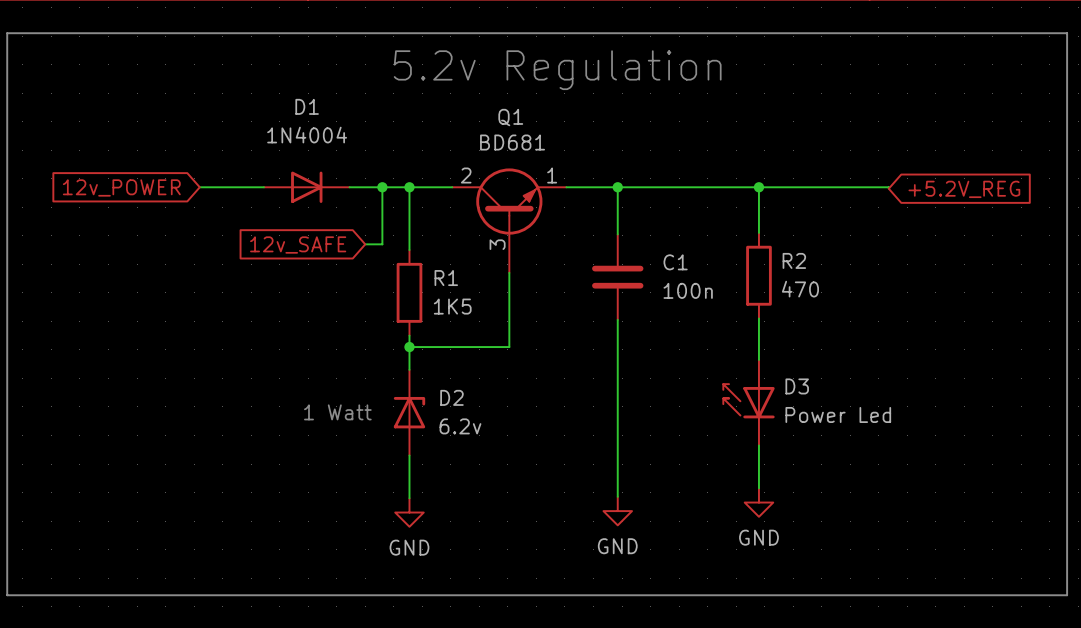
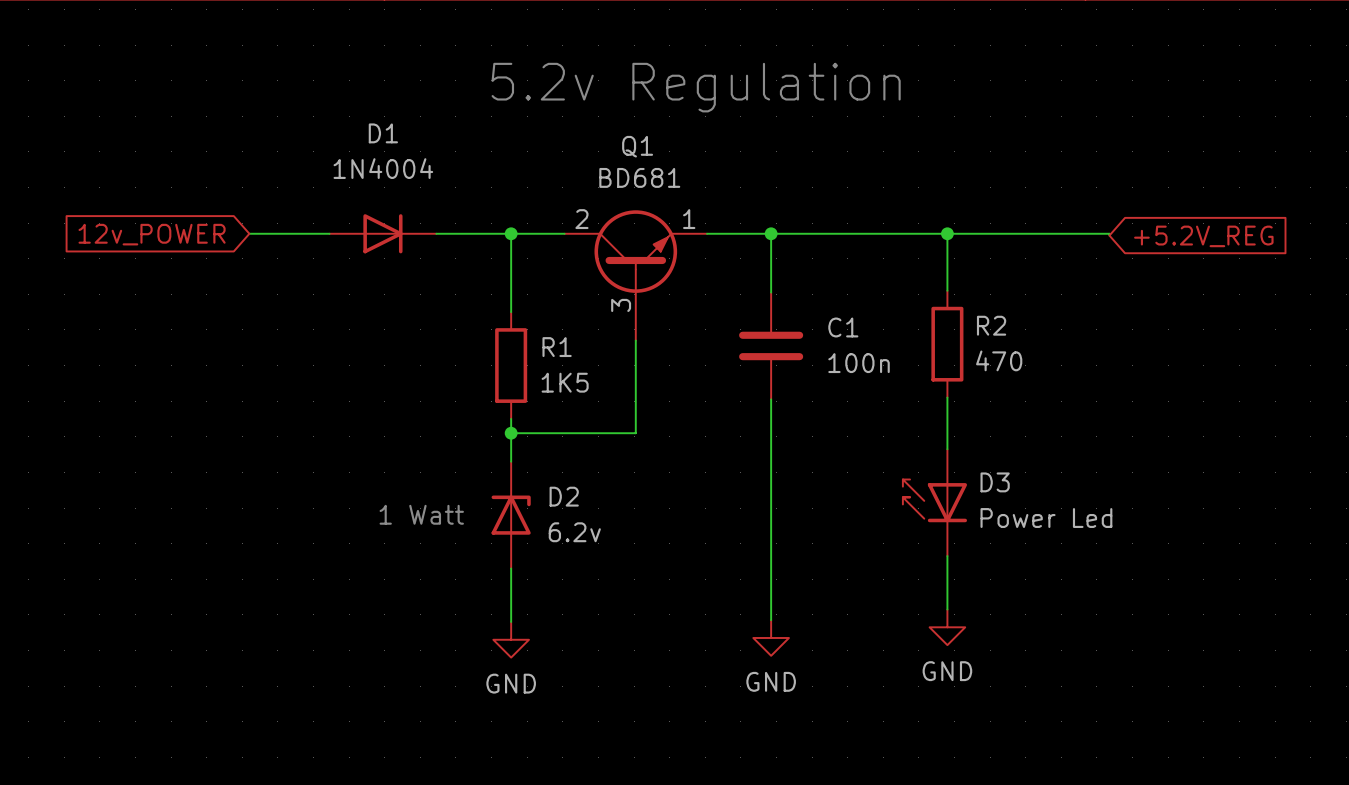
line: (7, 33) (7, 595) (1067, 595) (1067, 33) (7, 33) -> none
wire: (382, 187) (382, 244) (365, 244) -> none
junction: (382, 187) -> none
global label: 12v_SAFE (298, 245) -> none

